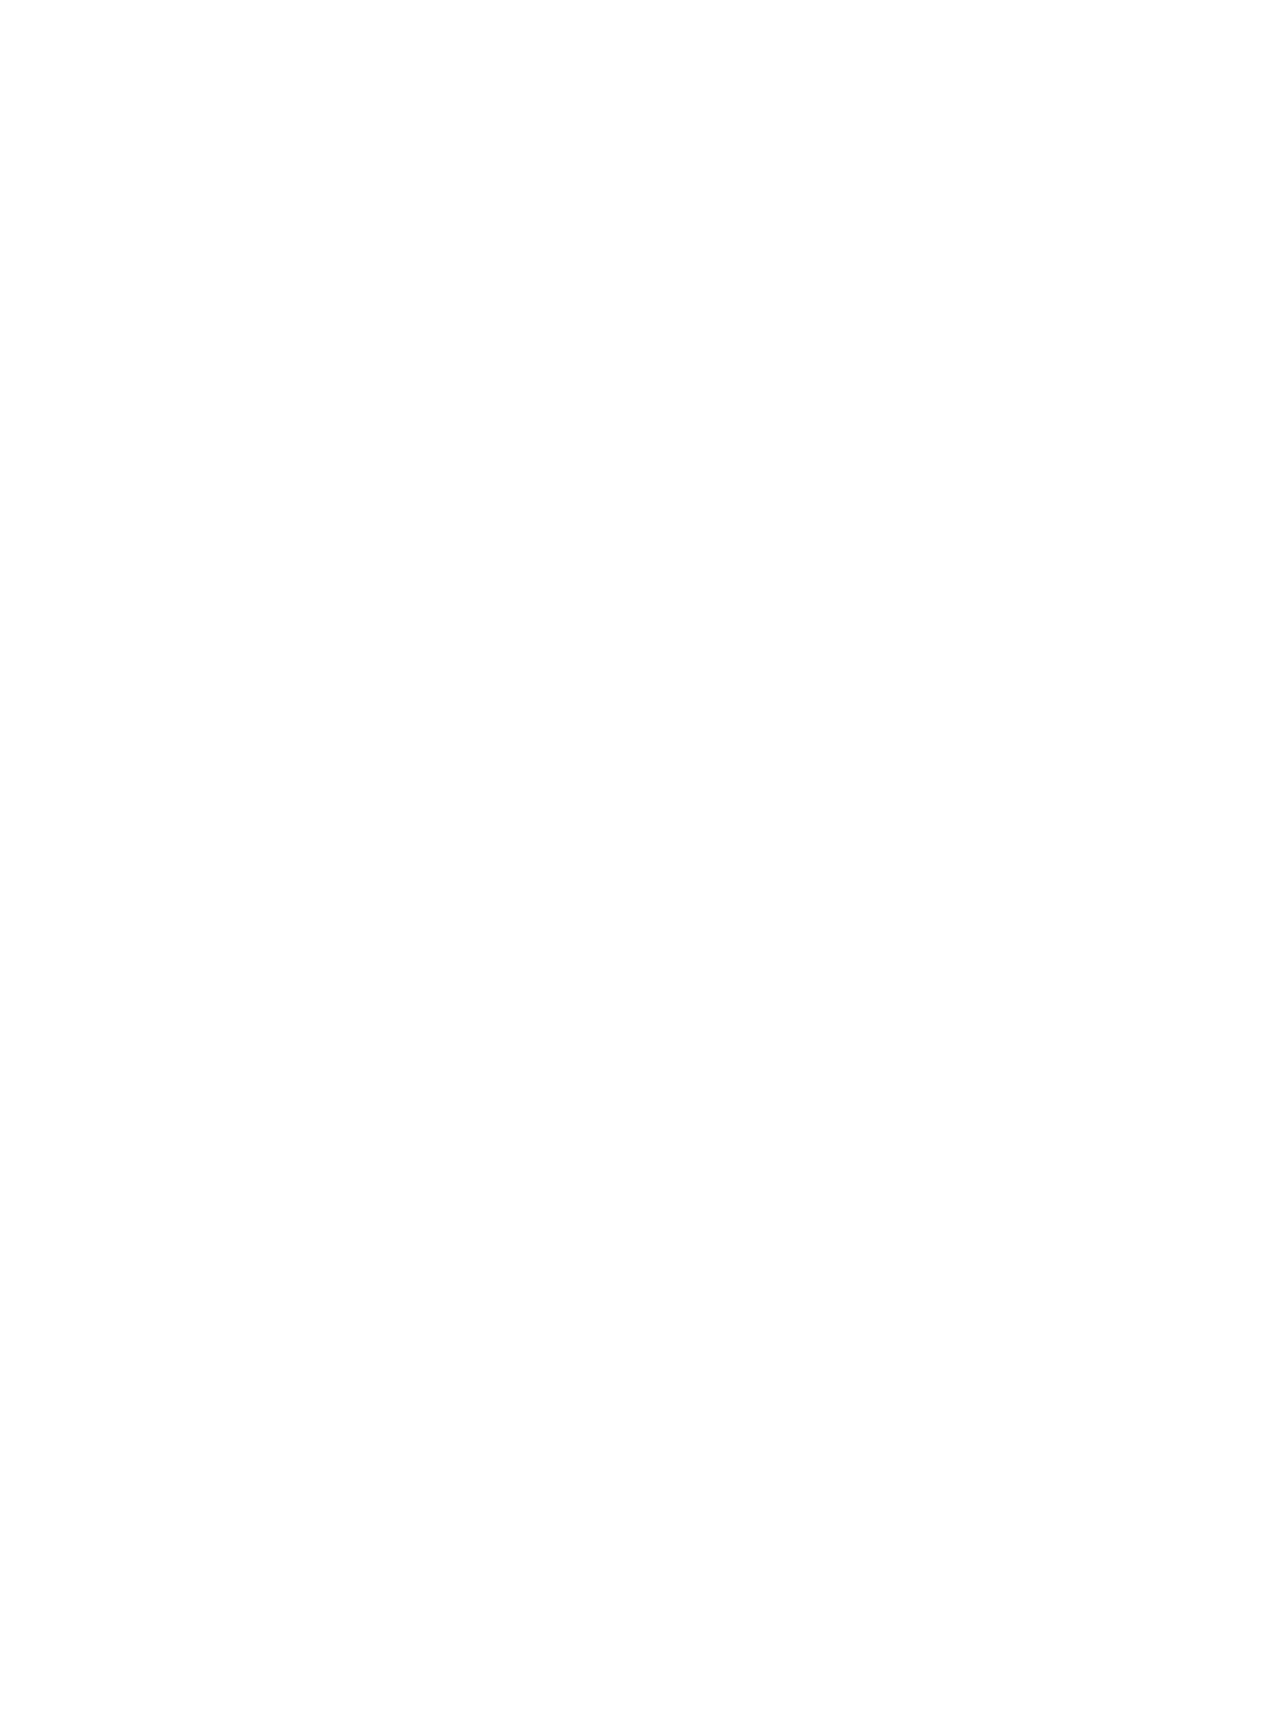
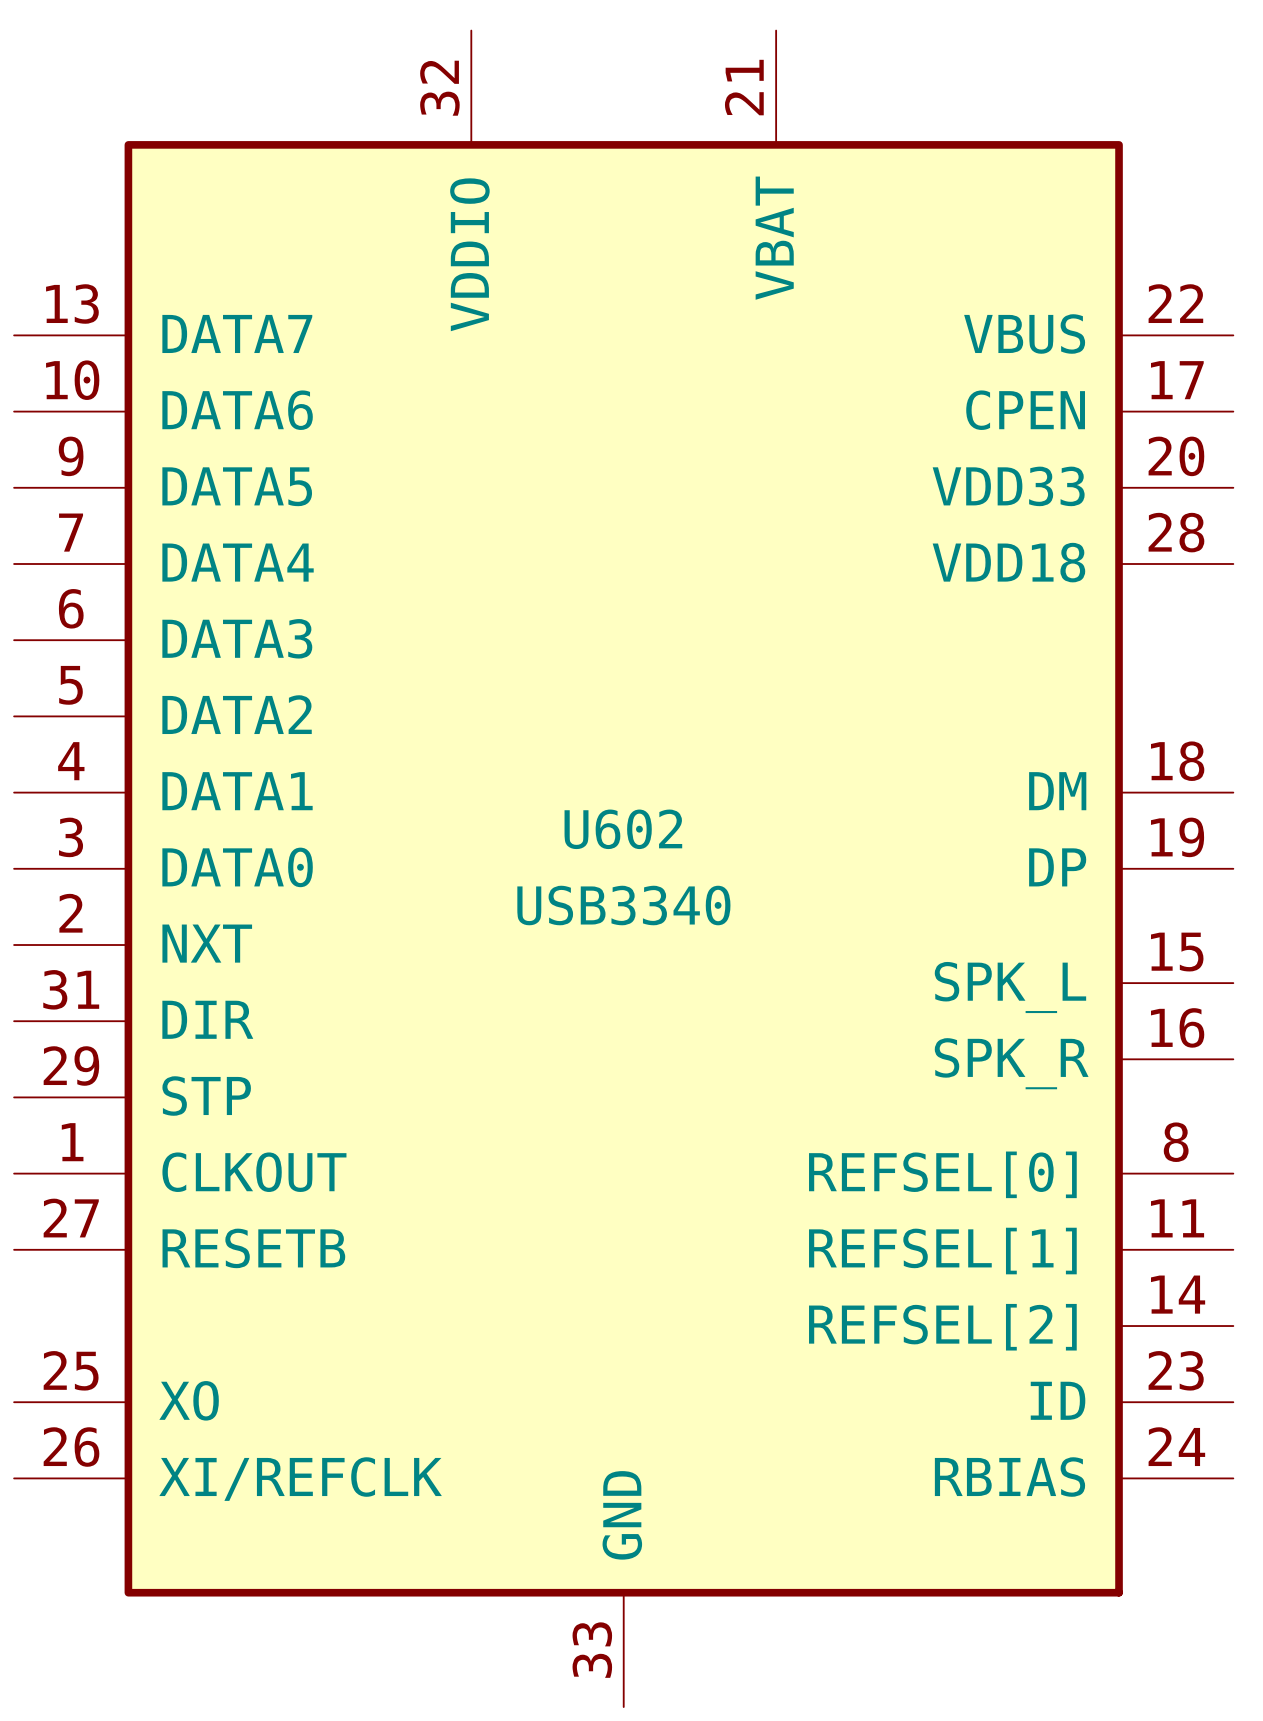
U602: none -> USB3340 (623, 868)

